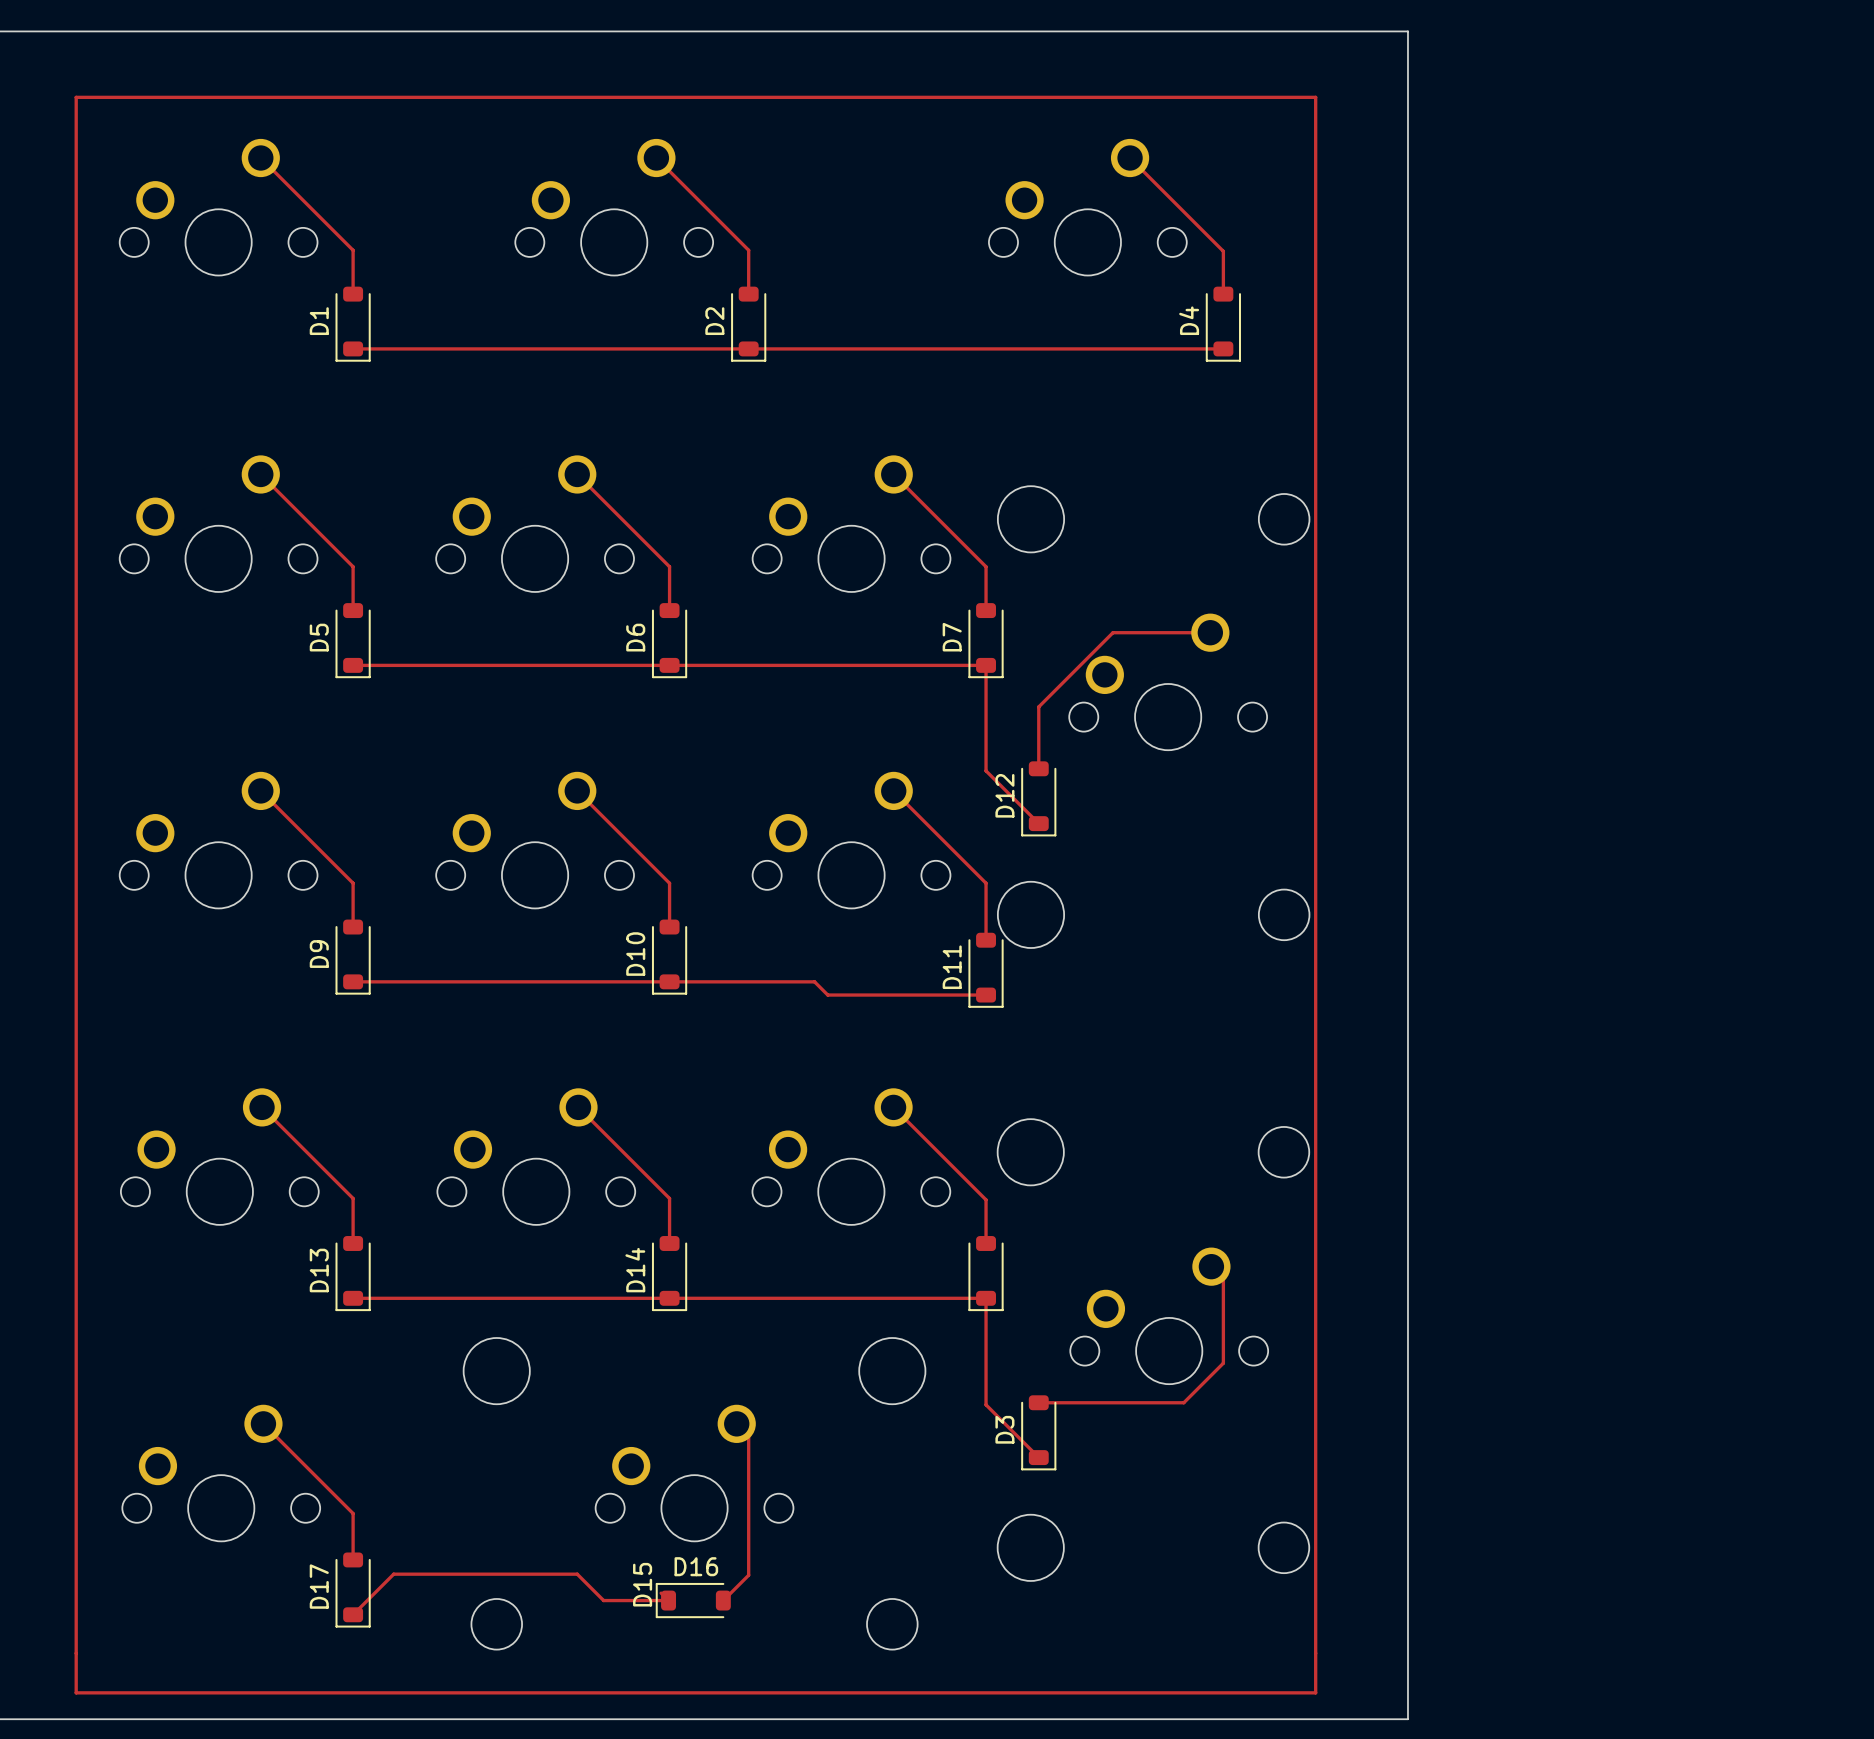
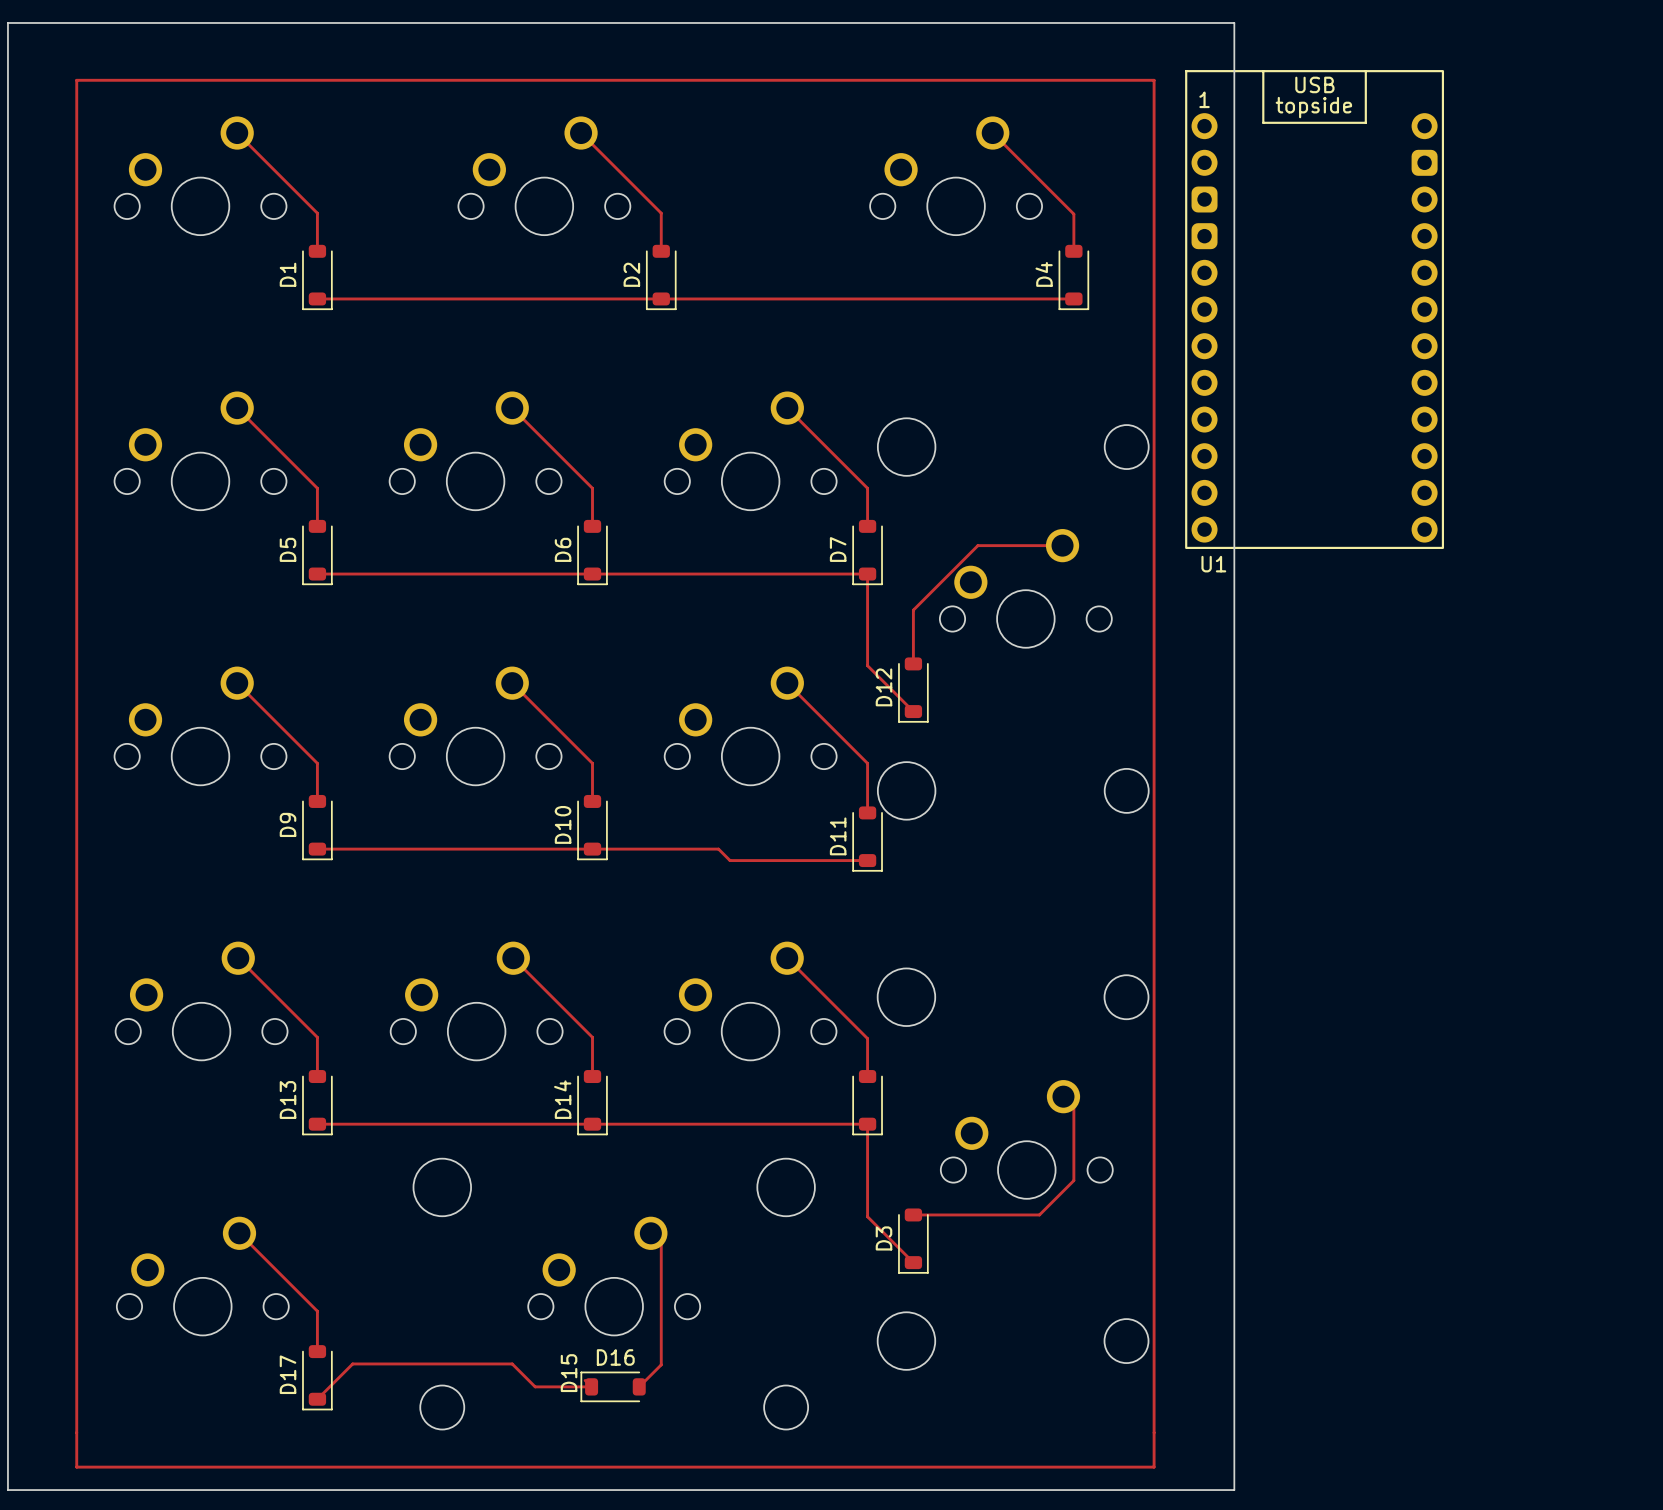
U1: none -> (1314, 309)

